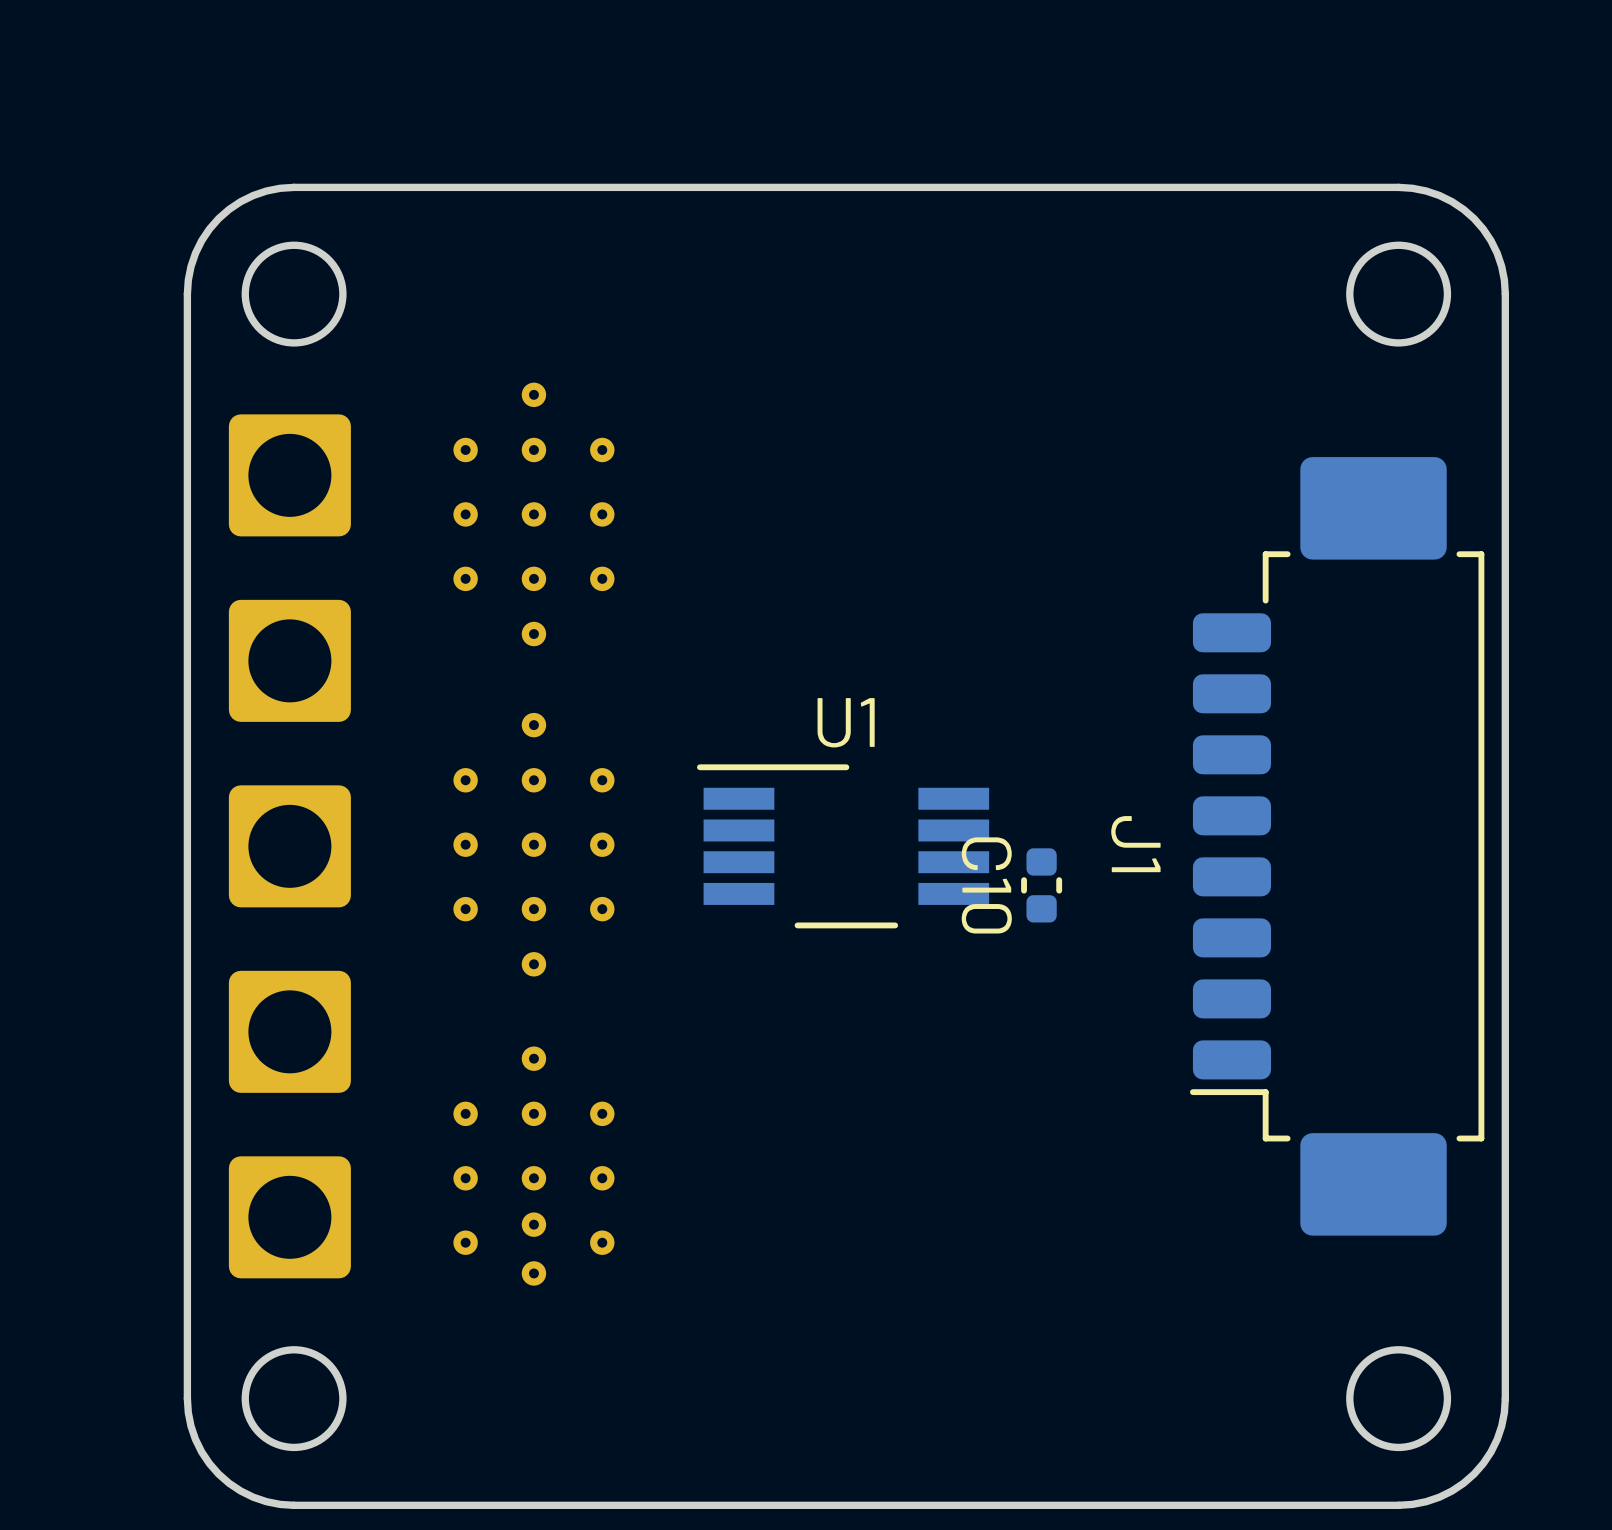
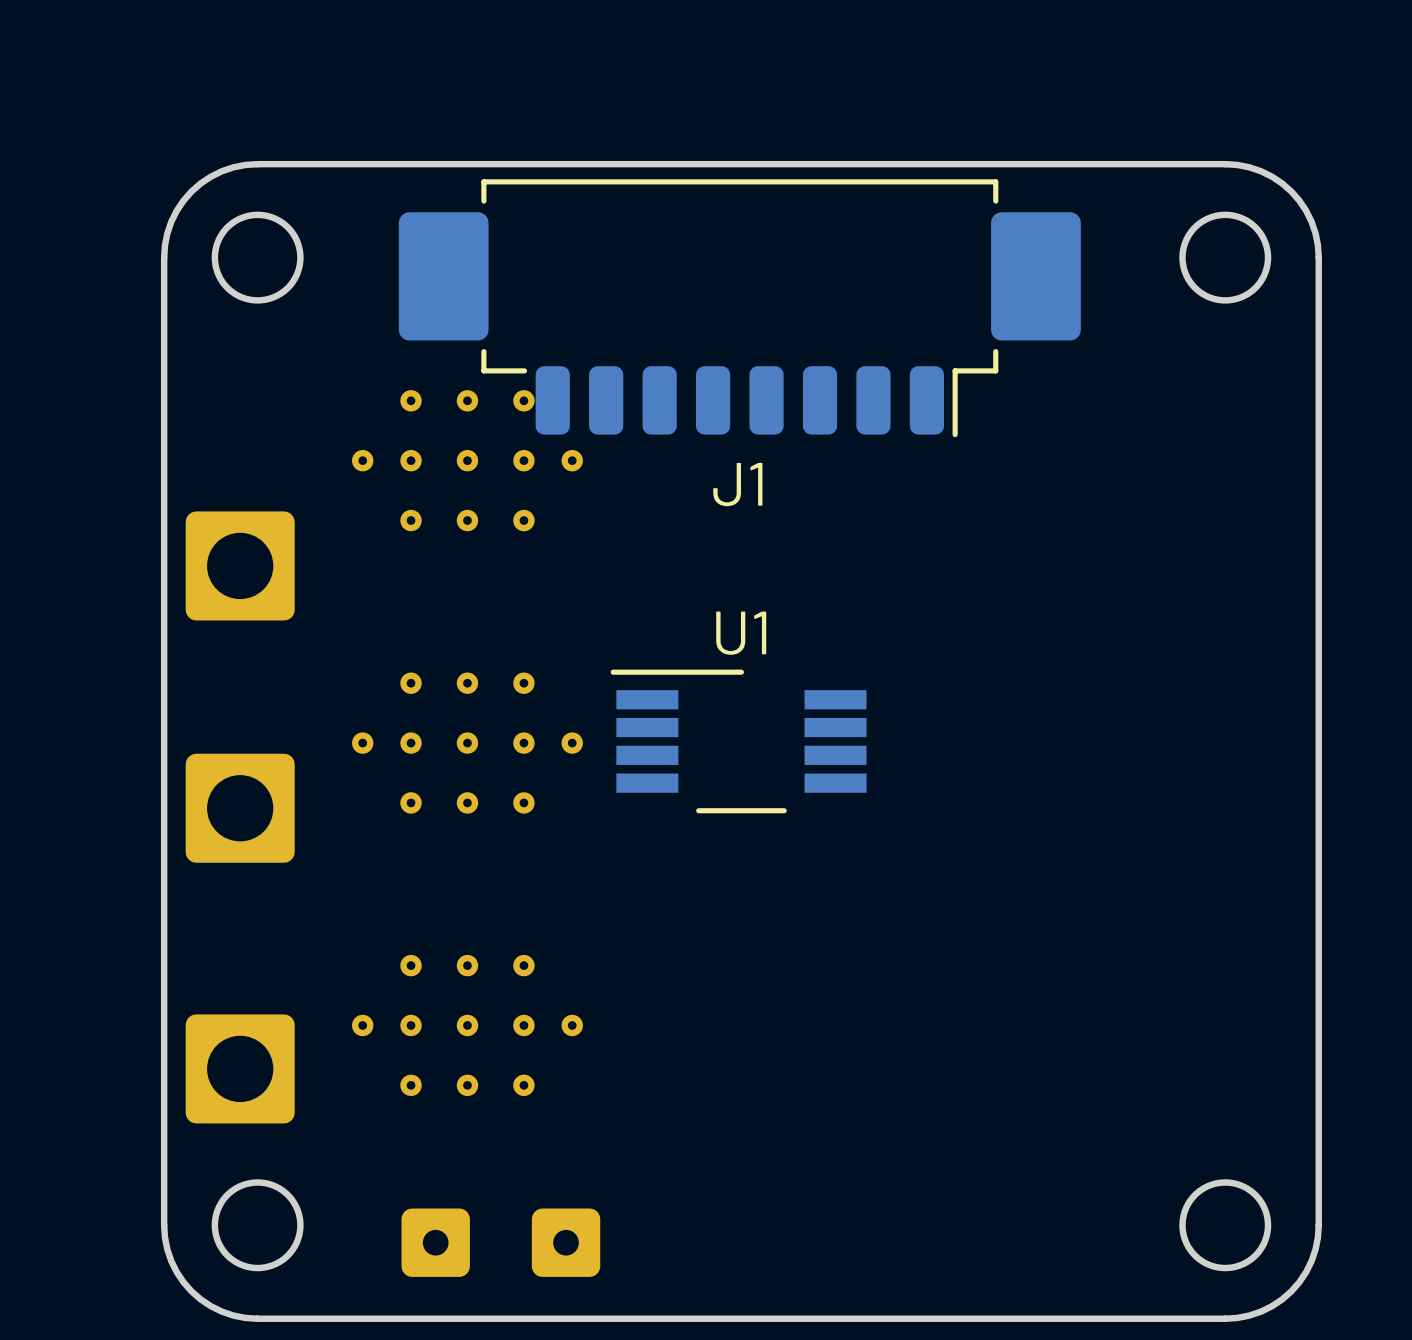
part: (289, 475) -> none
part rotation: 0° (533, 514) -> 90° clockwise (467, 460)
part footprint: [228, 599, 351, 722] -> [185, 511, 295, 621]
part rotation: 0° (533, 844) -> 90° clockwise (467, 743)
part: (289, 846) -> none
J1 rotation: 0° (1337, 846) -> 90° counterclockwise (739, 308)
J1 position: (1337, 846) -> (739, 308)
C10: (1041, 885) -> none
part: none -> (240, 808)
part: (289, 1031) -> none
part footprint: [453, 1046, 615, 1286] -> [352, 954, 583, 1097]
part footprint: [228, 1156, 351, 1279] -> [185, 1014, 295, 1124]
part: none -> (435, 1242)
part: none -> (566, 1242)

